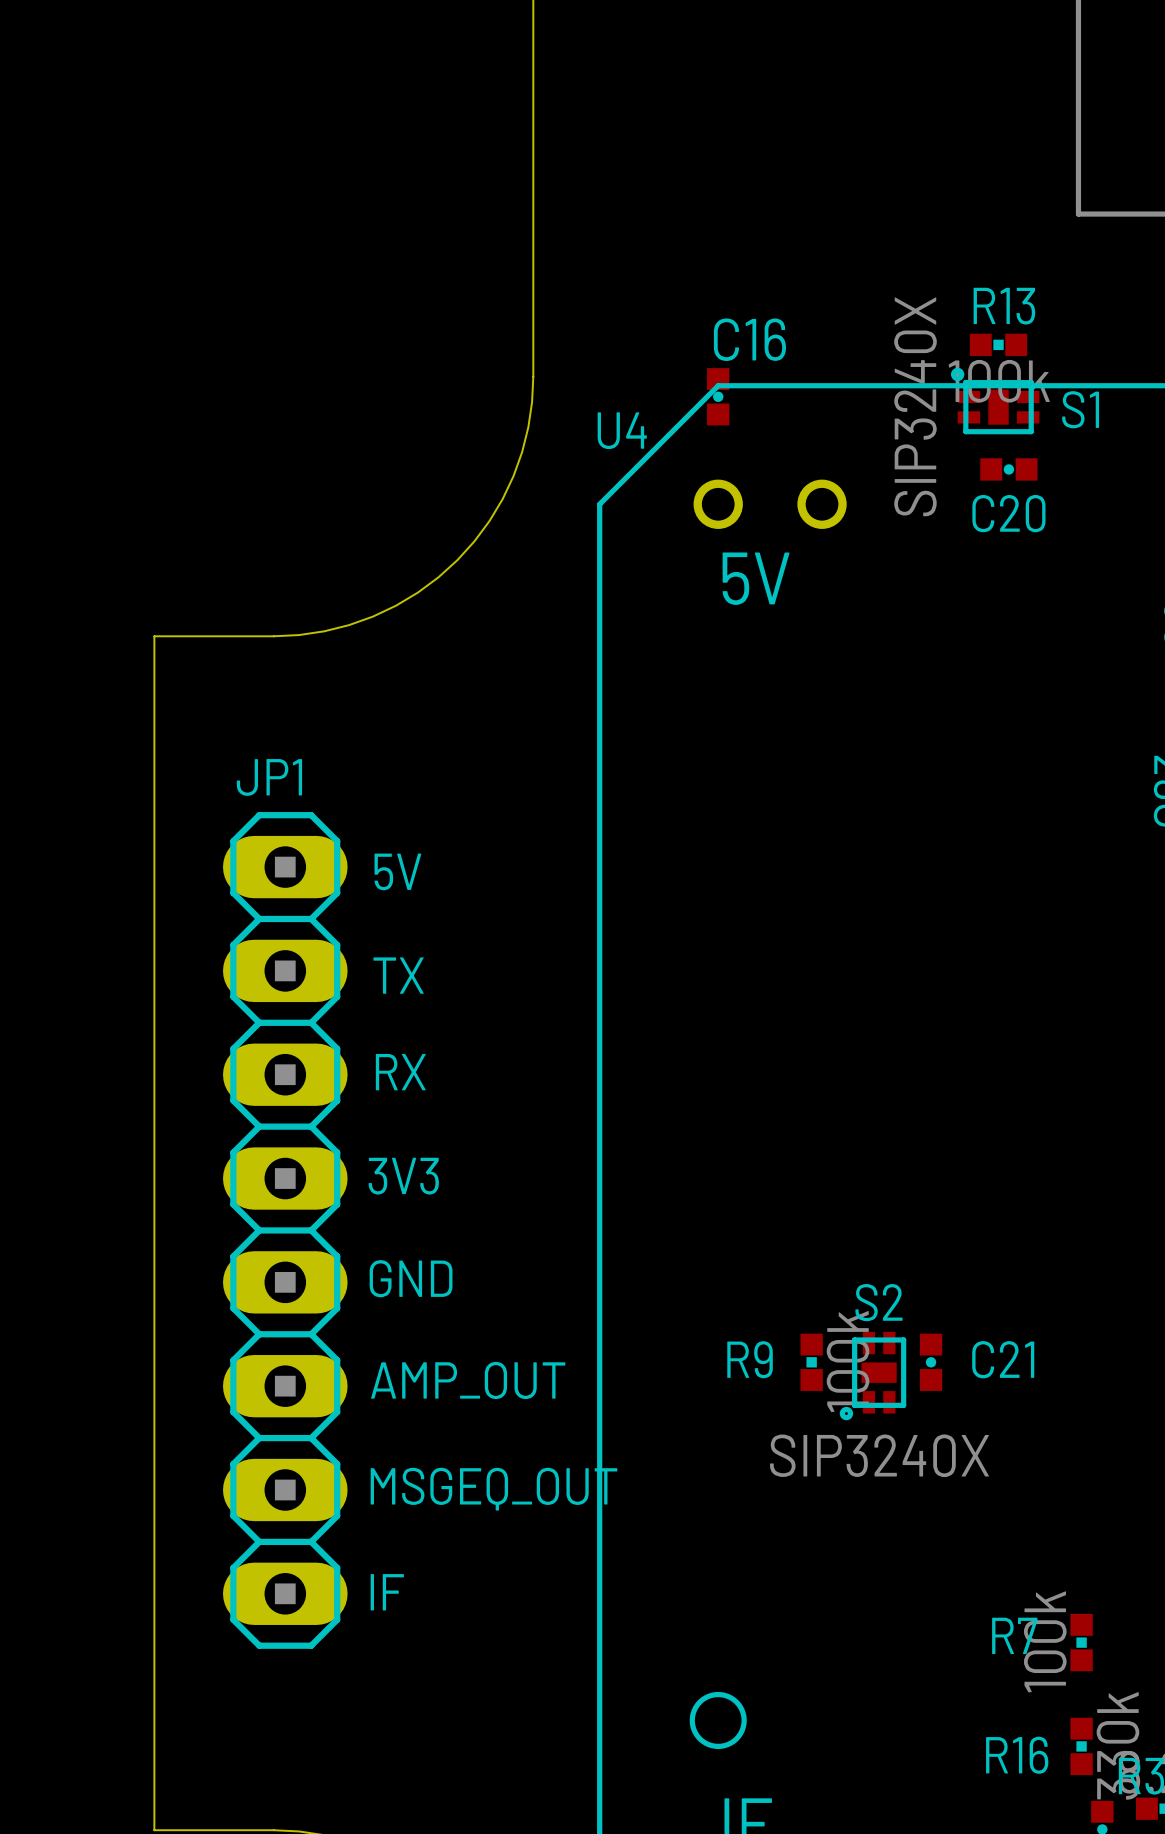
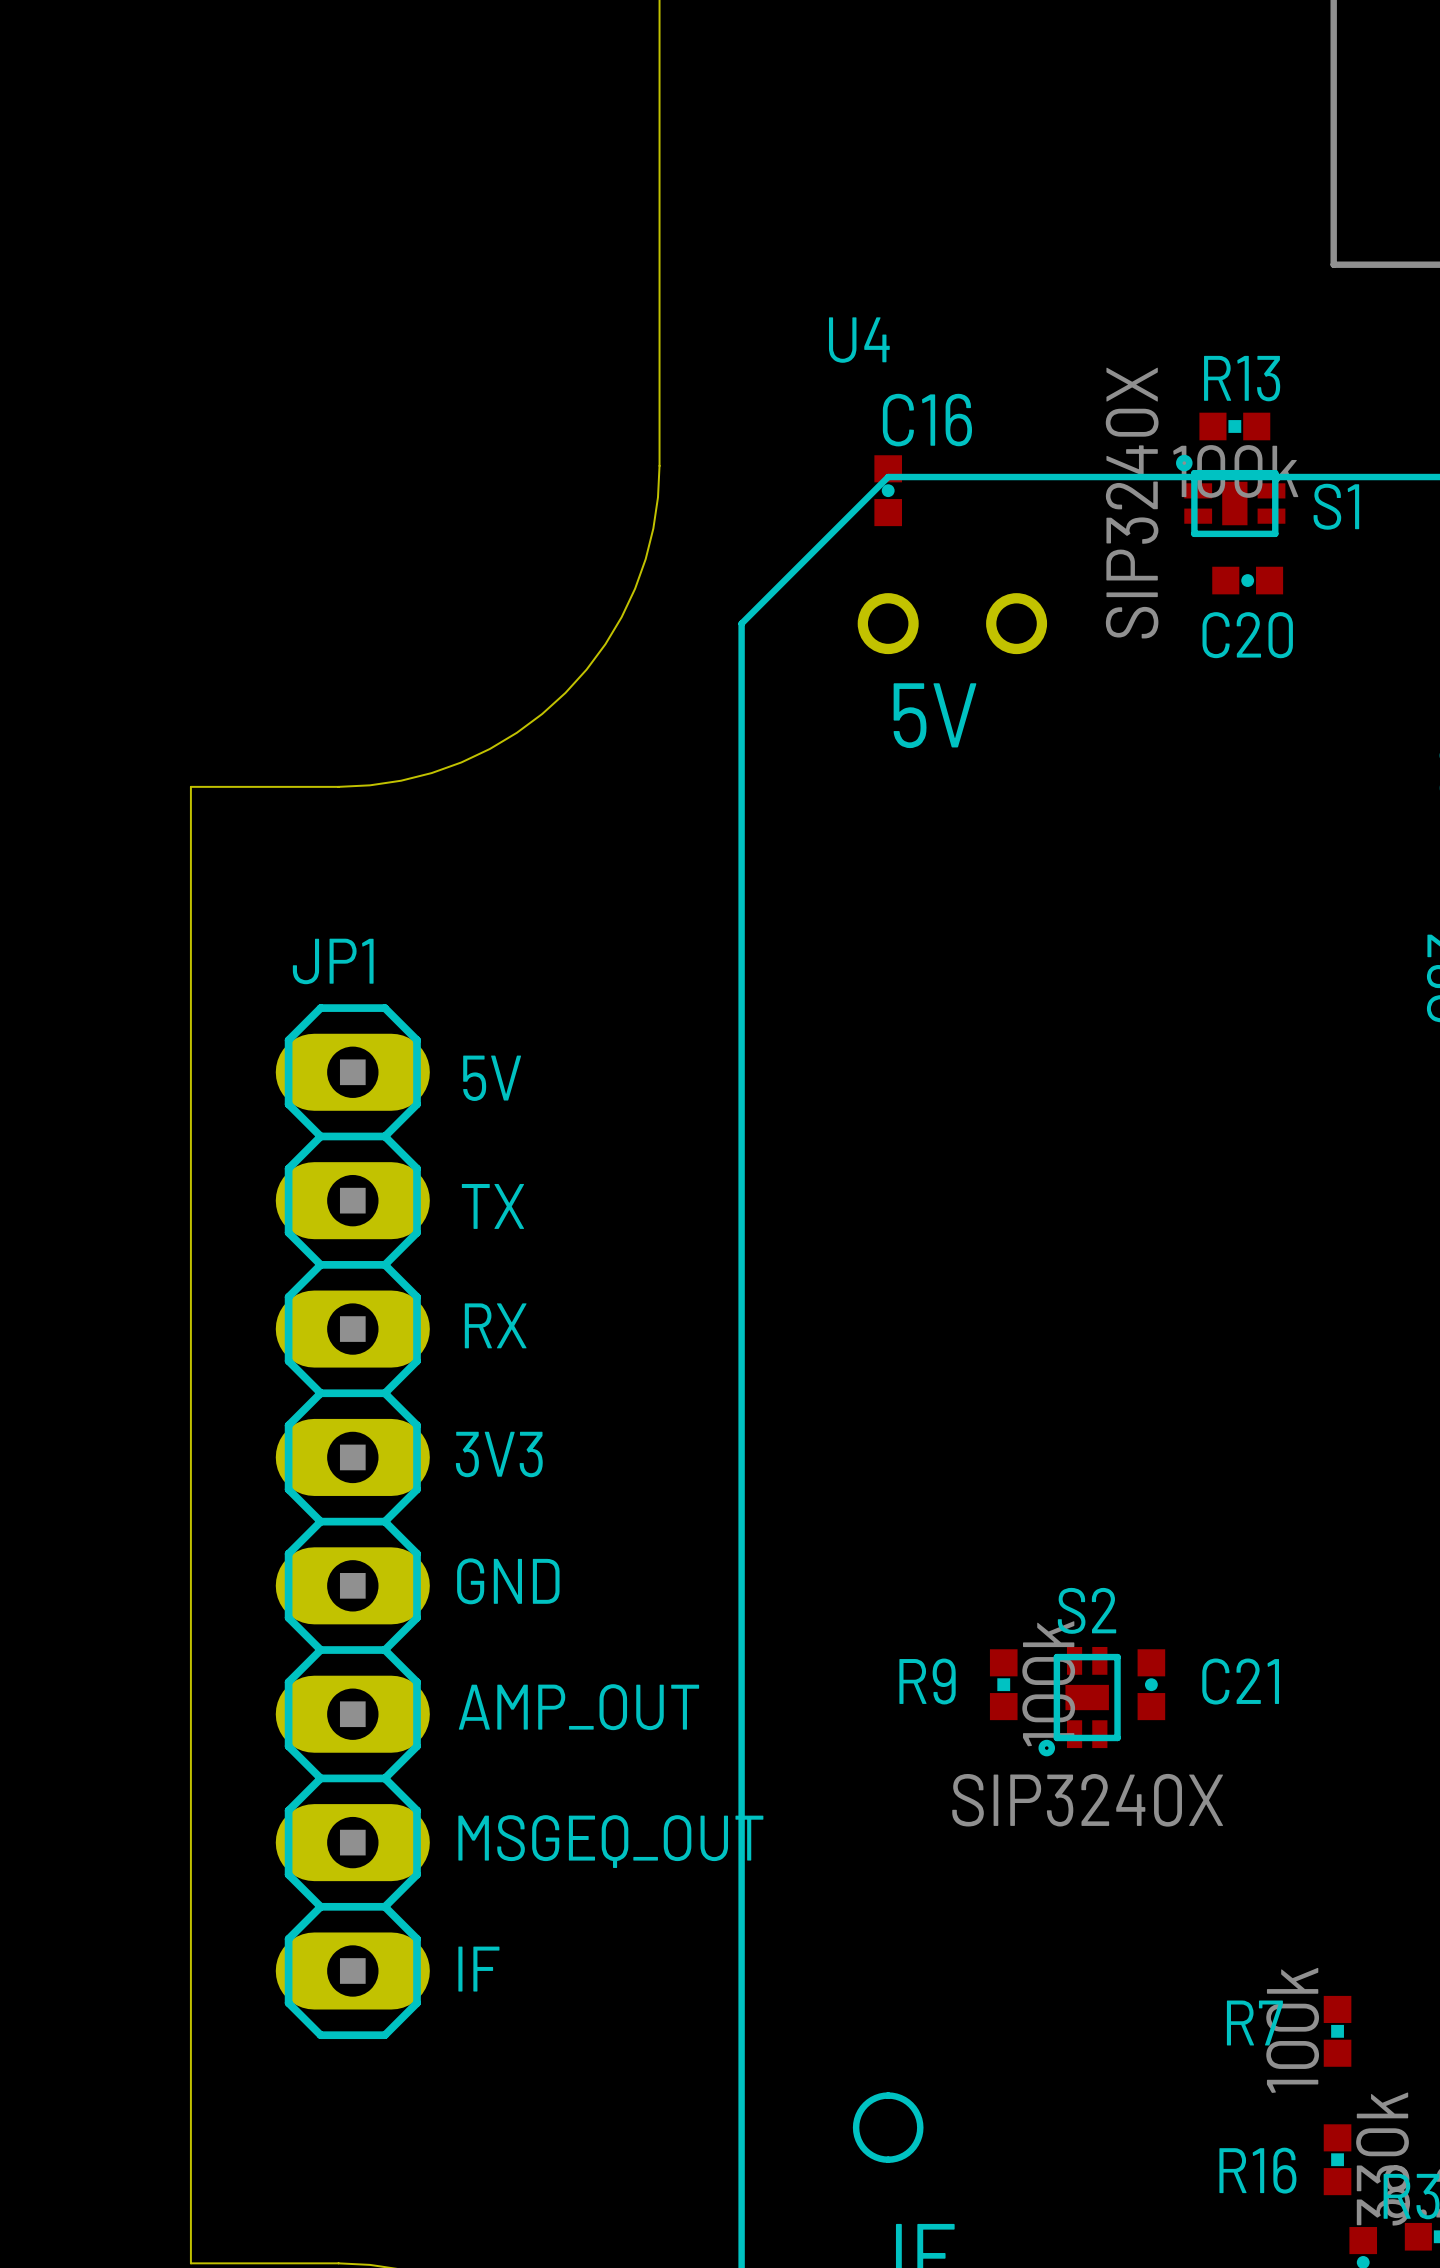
U4 name position: U4 (622, 430) -> U4 (859, 340)

